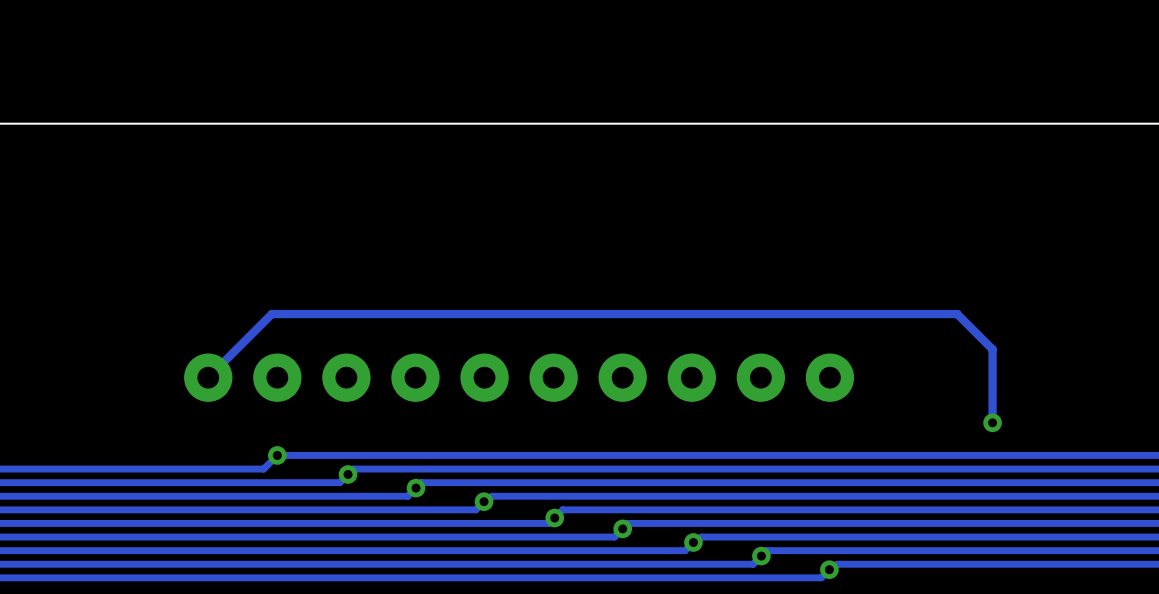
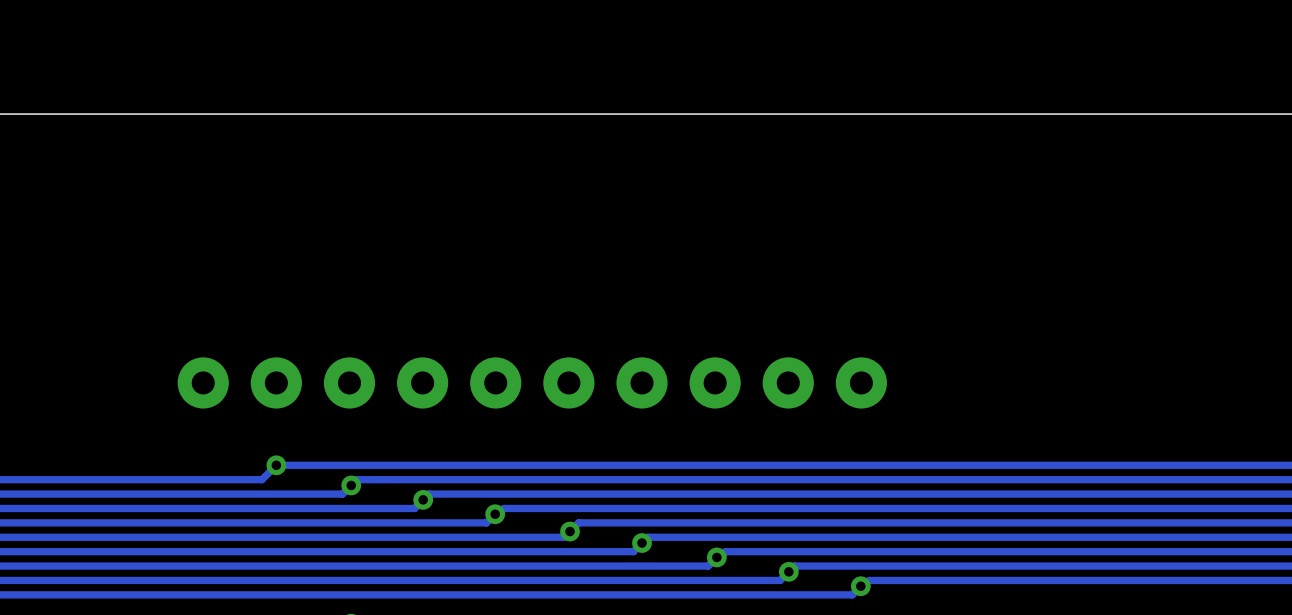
track: (208, 377) (271, 314) (957, 314) (992, 349) (992, 422) -> none
via: (992, 422) -> none

